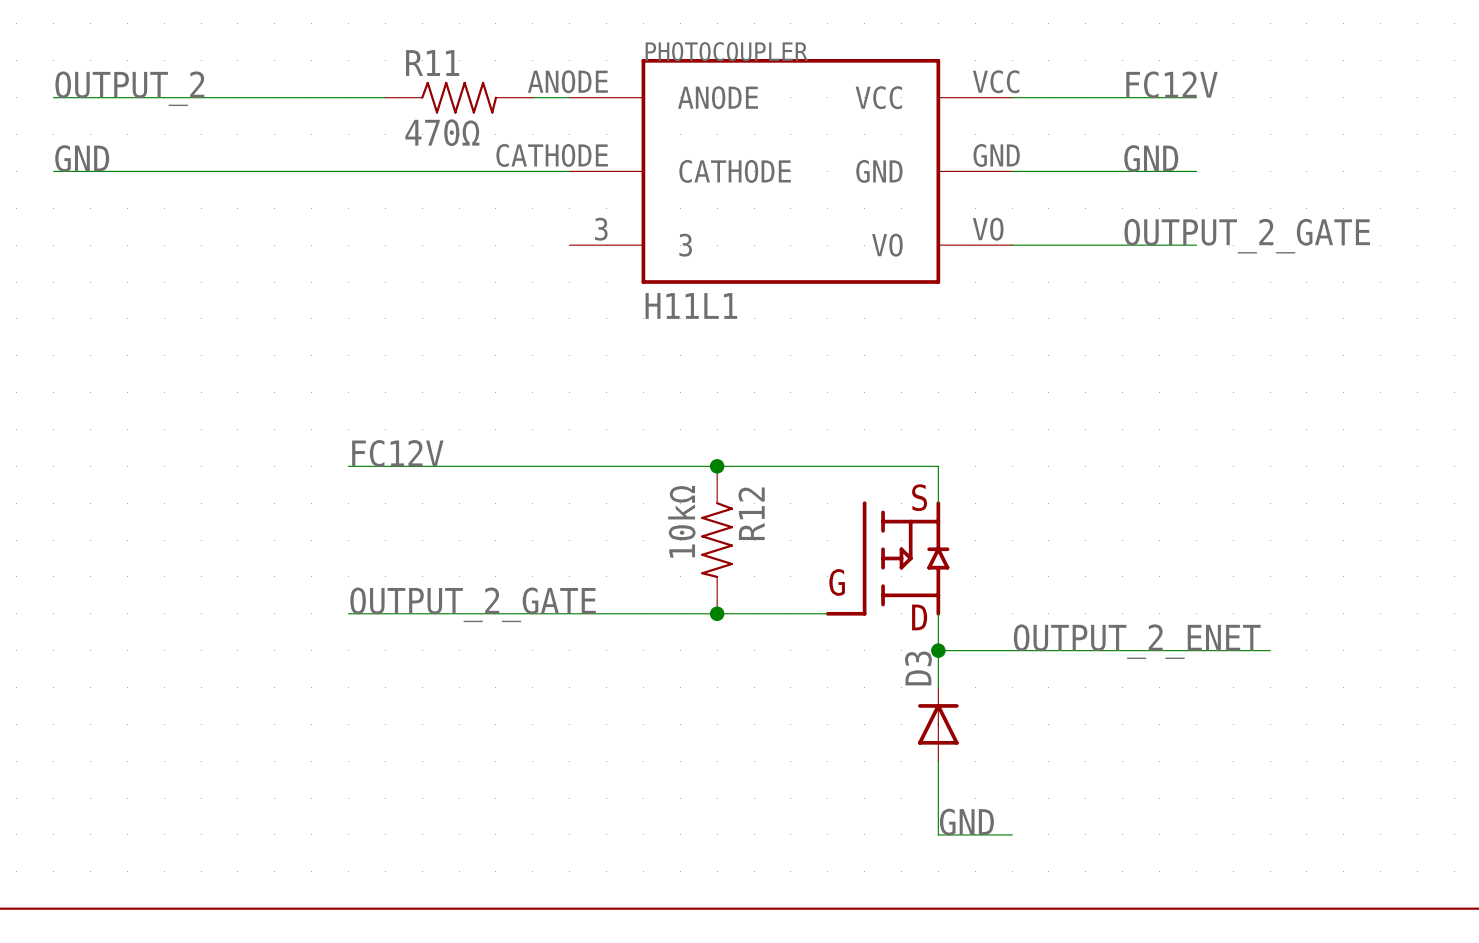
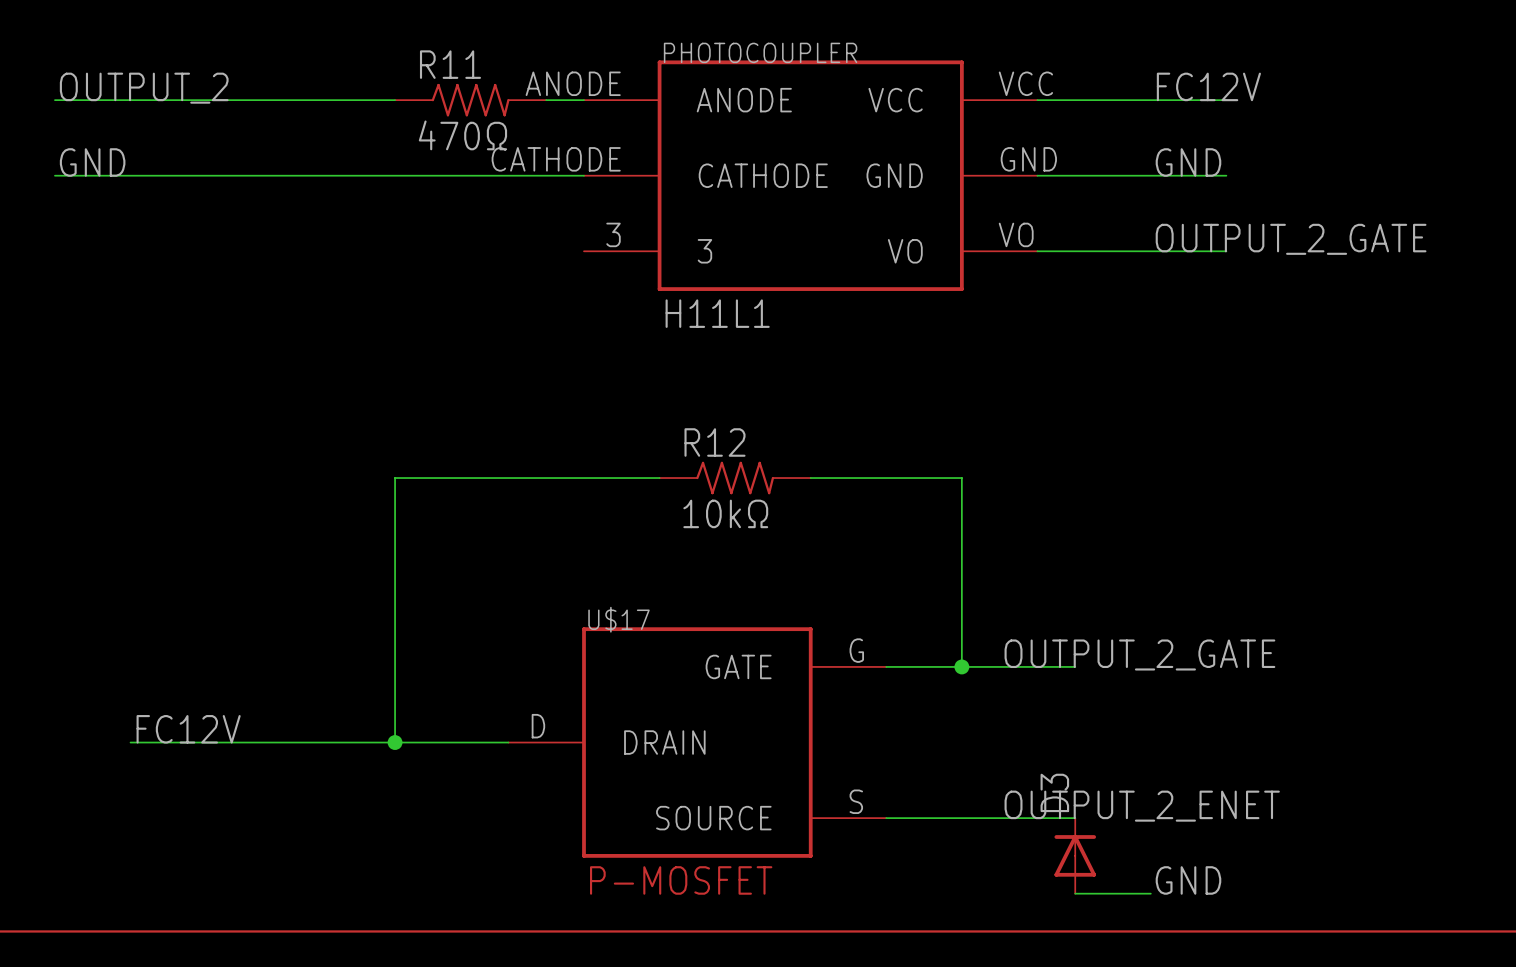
label position: FC12V (397, 453) -> FC12V (188, 729)
wire: (348, 466) (385, 466) -> (395, 742) (395, 478)
junction: (717, 466) -> none
R12 rotation: 0° (717, 540) -> 90° counterclockwise (735, 478)
part: (887, 558) -> none
label: OUTPUT_2_GATE (473, 604) -> none
wire: (348, 613) (827, 613) -> none
junction: (717, 613) -> none
label: none -> OUTPUT_2_GATE (1139, 654)
label position: OUTPUT_2_ENET (1137, 641) -> OUTPUT_2_ENET (1142, 806)
wire: (938, 650) (938, 687) -> (961, 666) (886, 666)
wire: (1048, 650) (1270, 650) -> none
wire: none -> (130, 742) (508, 742)
junction: none -> (395, 742)
U$17: none -> (697, 742)
D3 position: (938, 724) -> (1075, 855)
wire: (938, 761) (938, 834) (1012, 834) -> none
wire: none -> (886, 818) (1075, 818)
label position: GND (966, 822) -> GND (1188, 880)
wire: none -> (1075, 893) (1150, 893)

